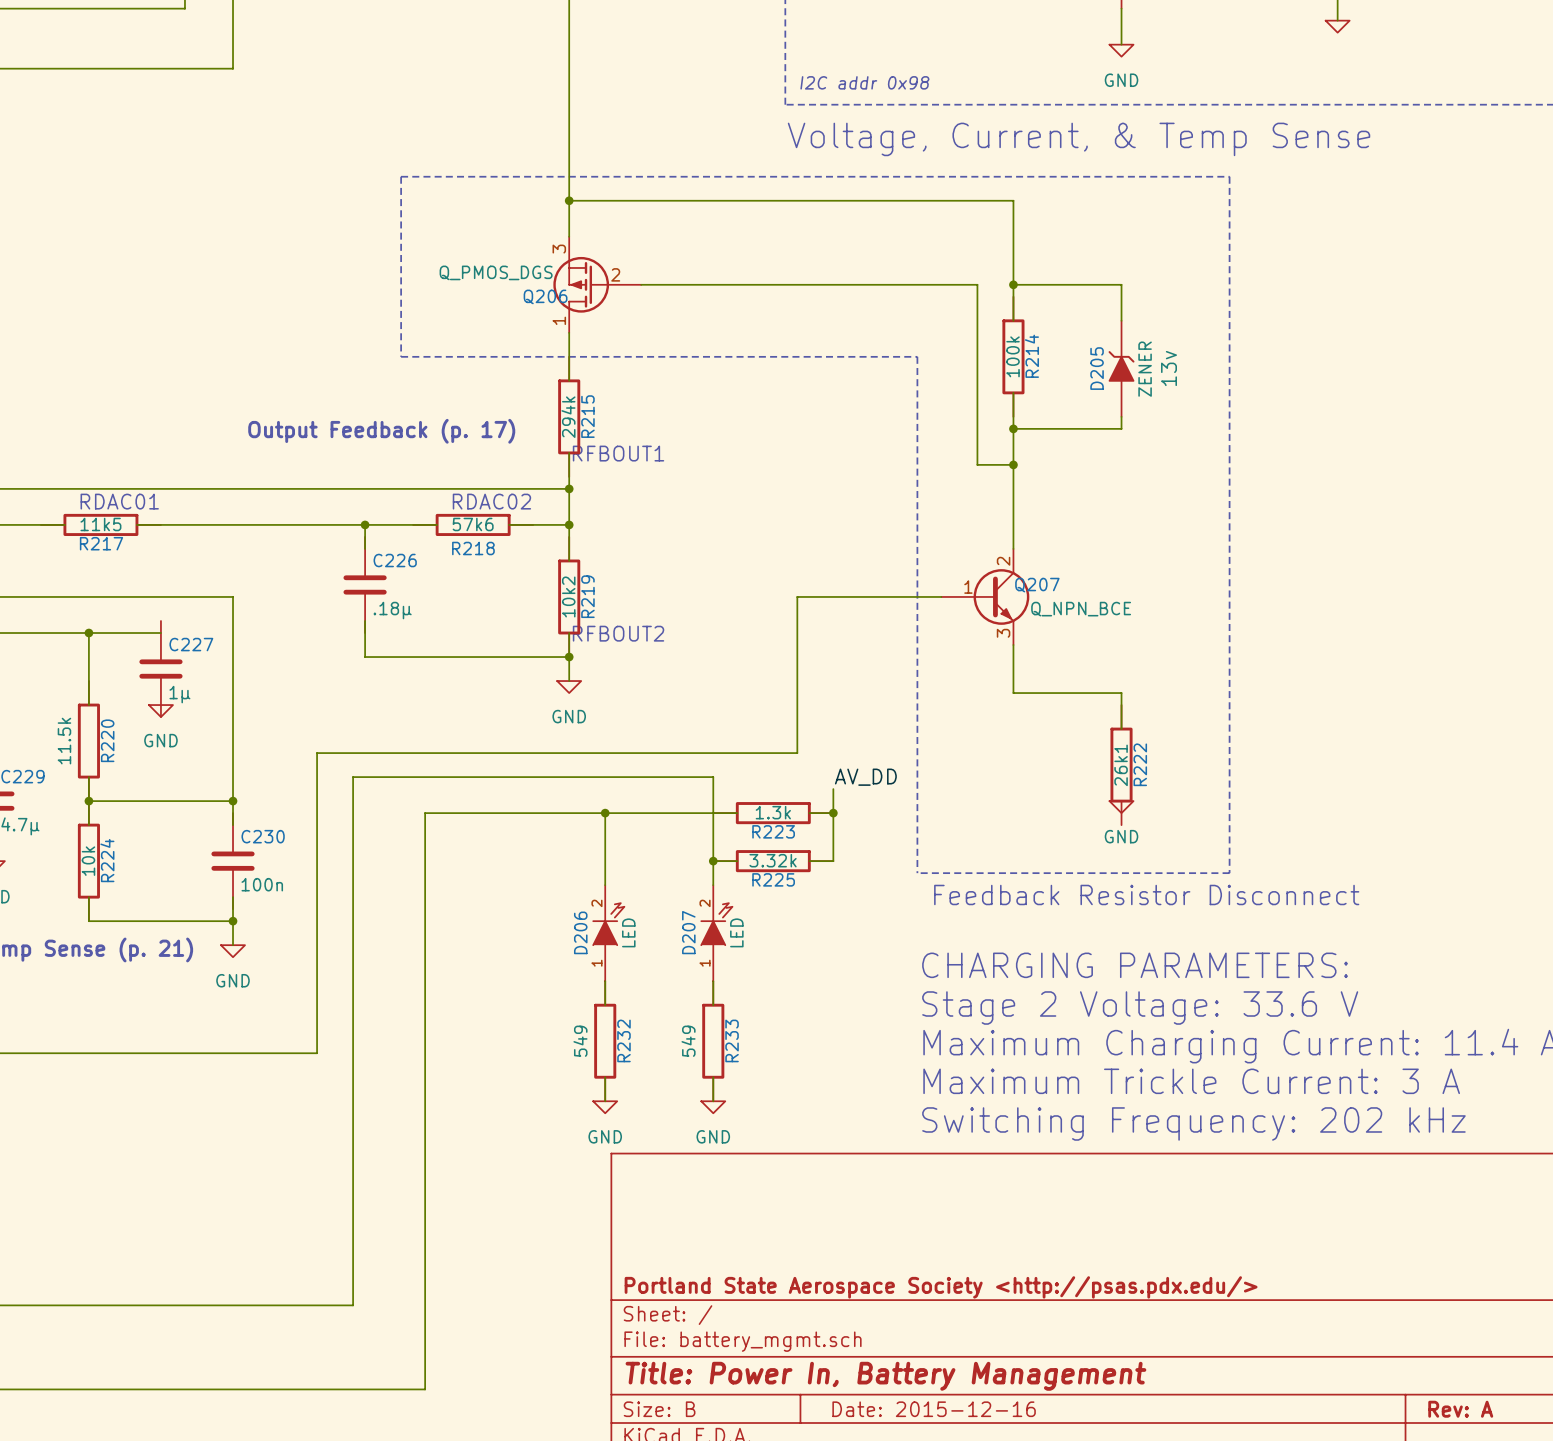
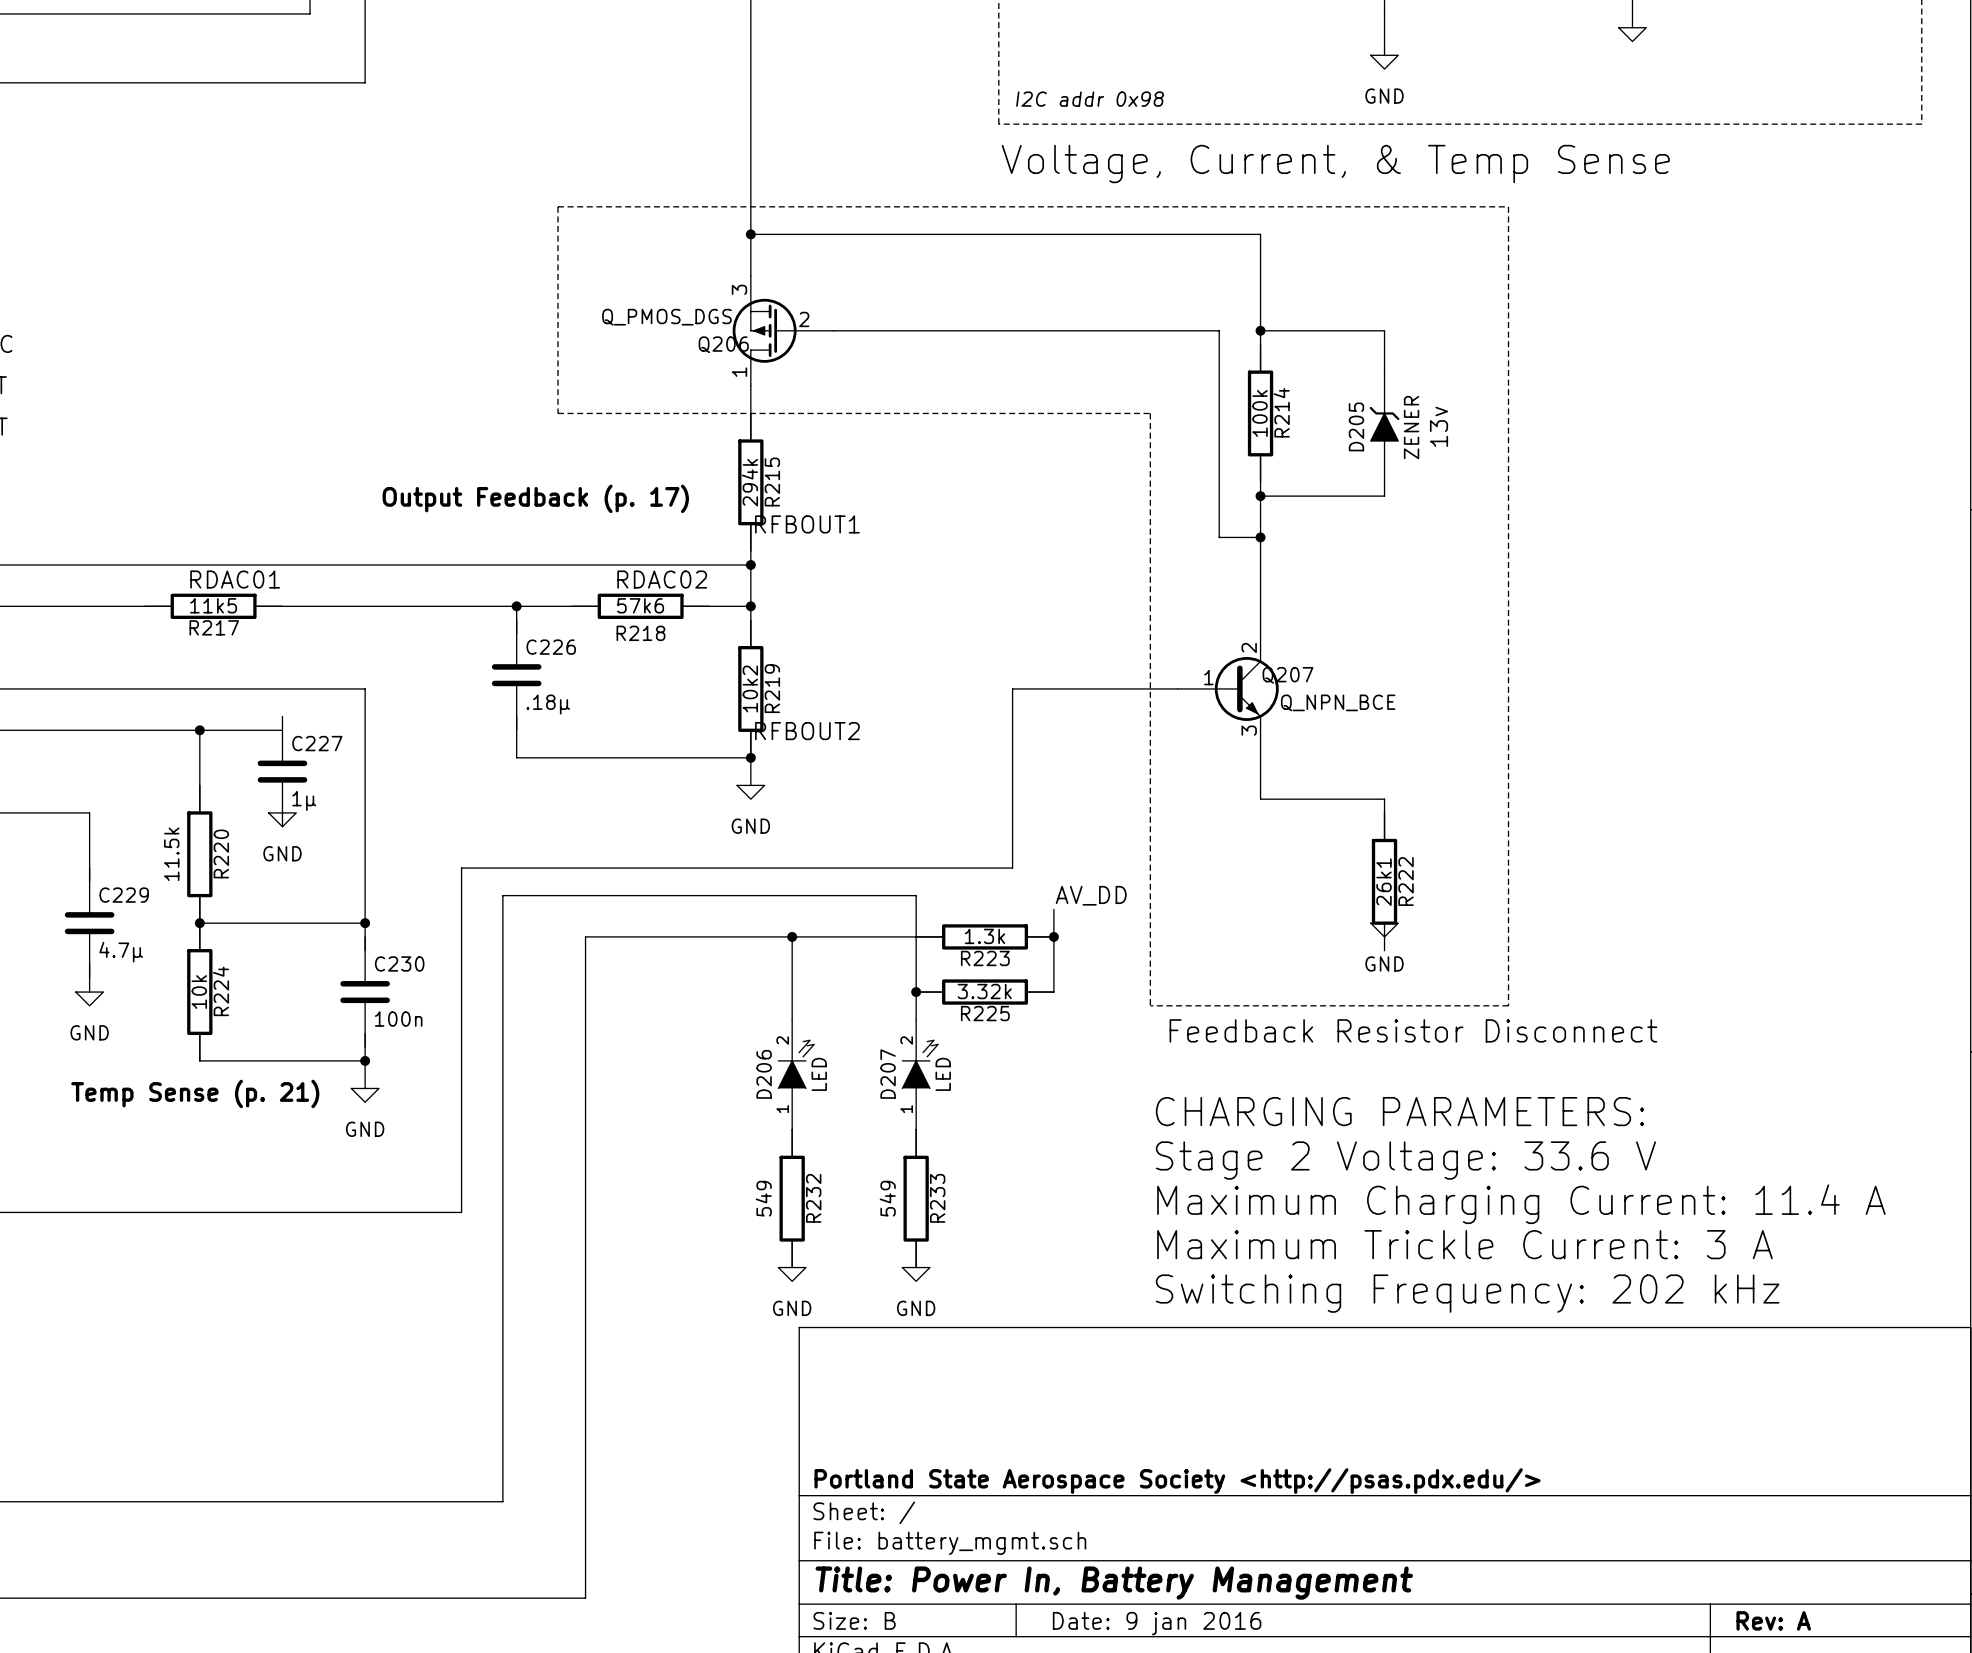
title block: Date: 2015-12-16 (934, 1409) -> Date: 9 jan 2016 (1157, 1623)

